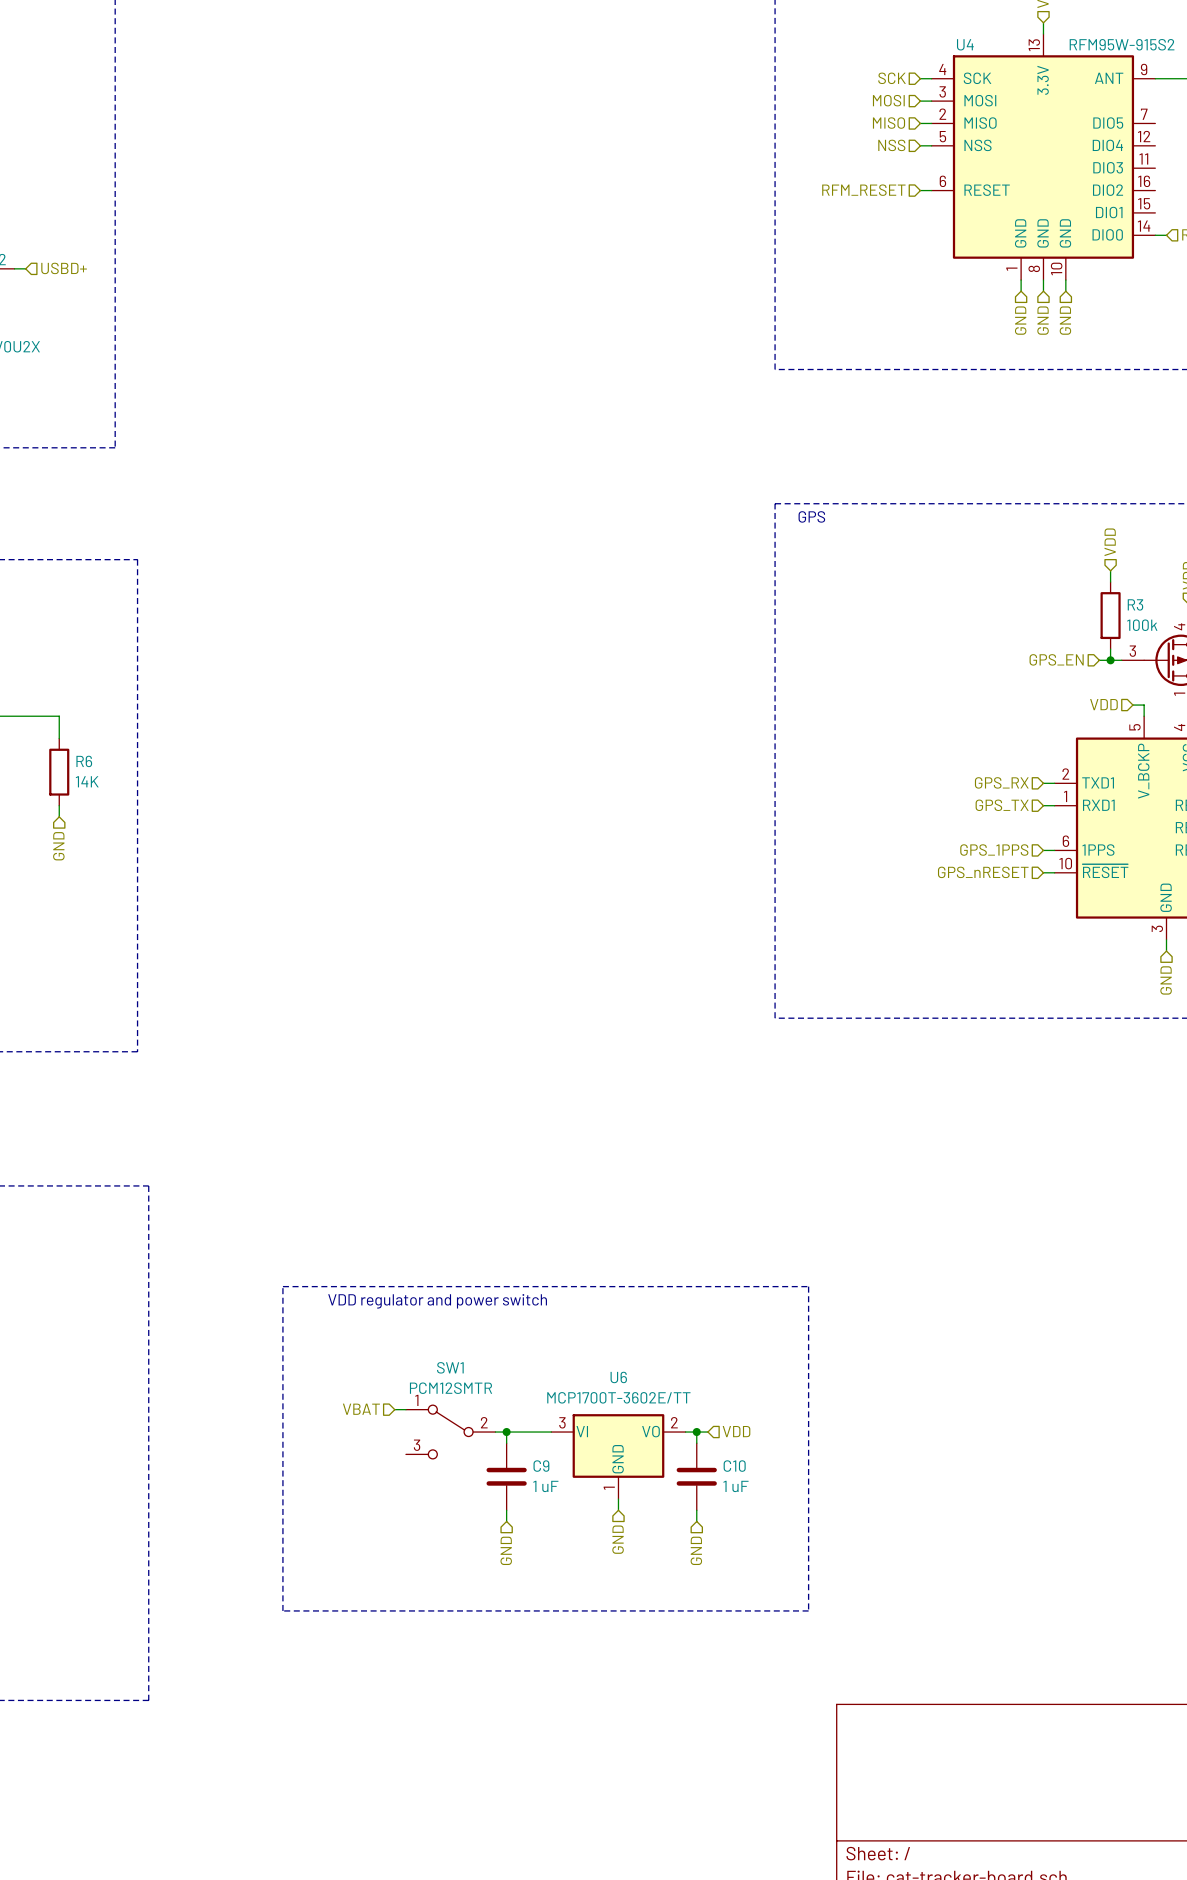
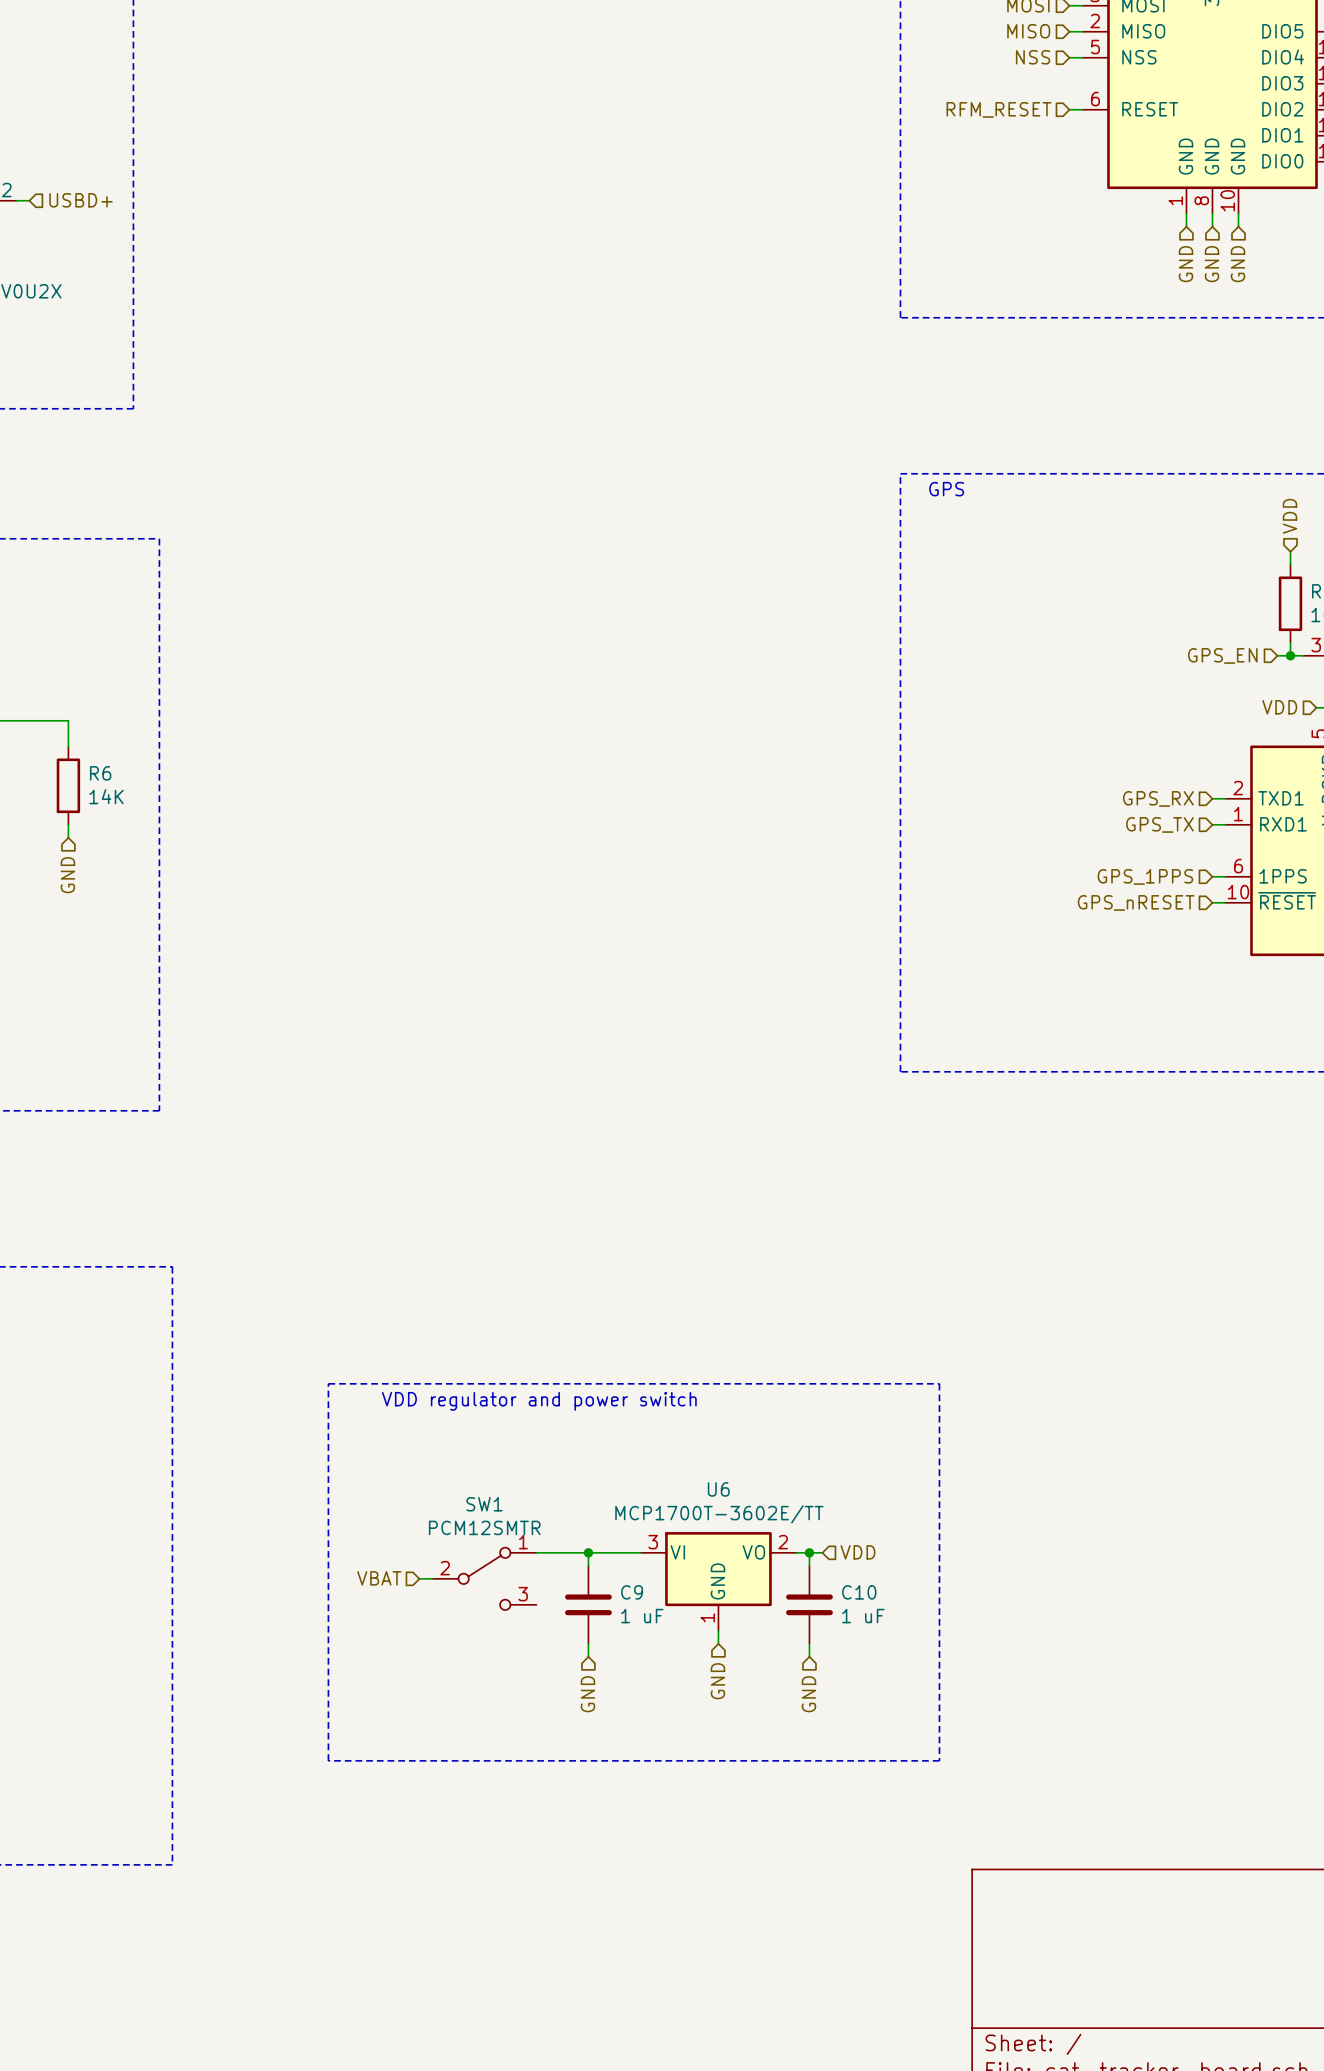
hierarchical label position: VBAT (361, 1409) -> VBAT (379, 1578)
wire: (394, 1409) (405, 1409) -> (419, 1578) (432, 1578)
SW1 flip: as is (450, 1432) -> left-right (484, 1578)

